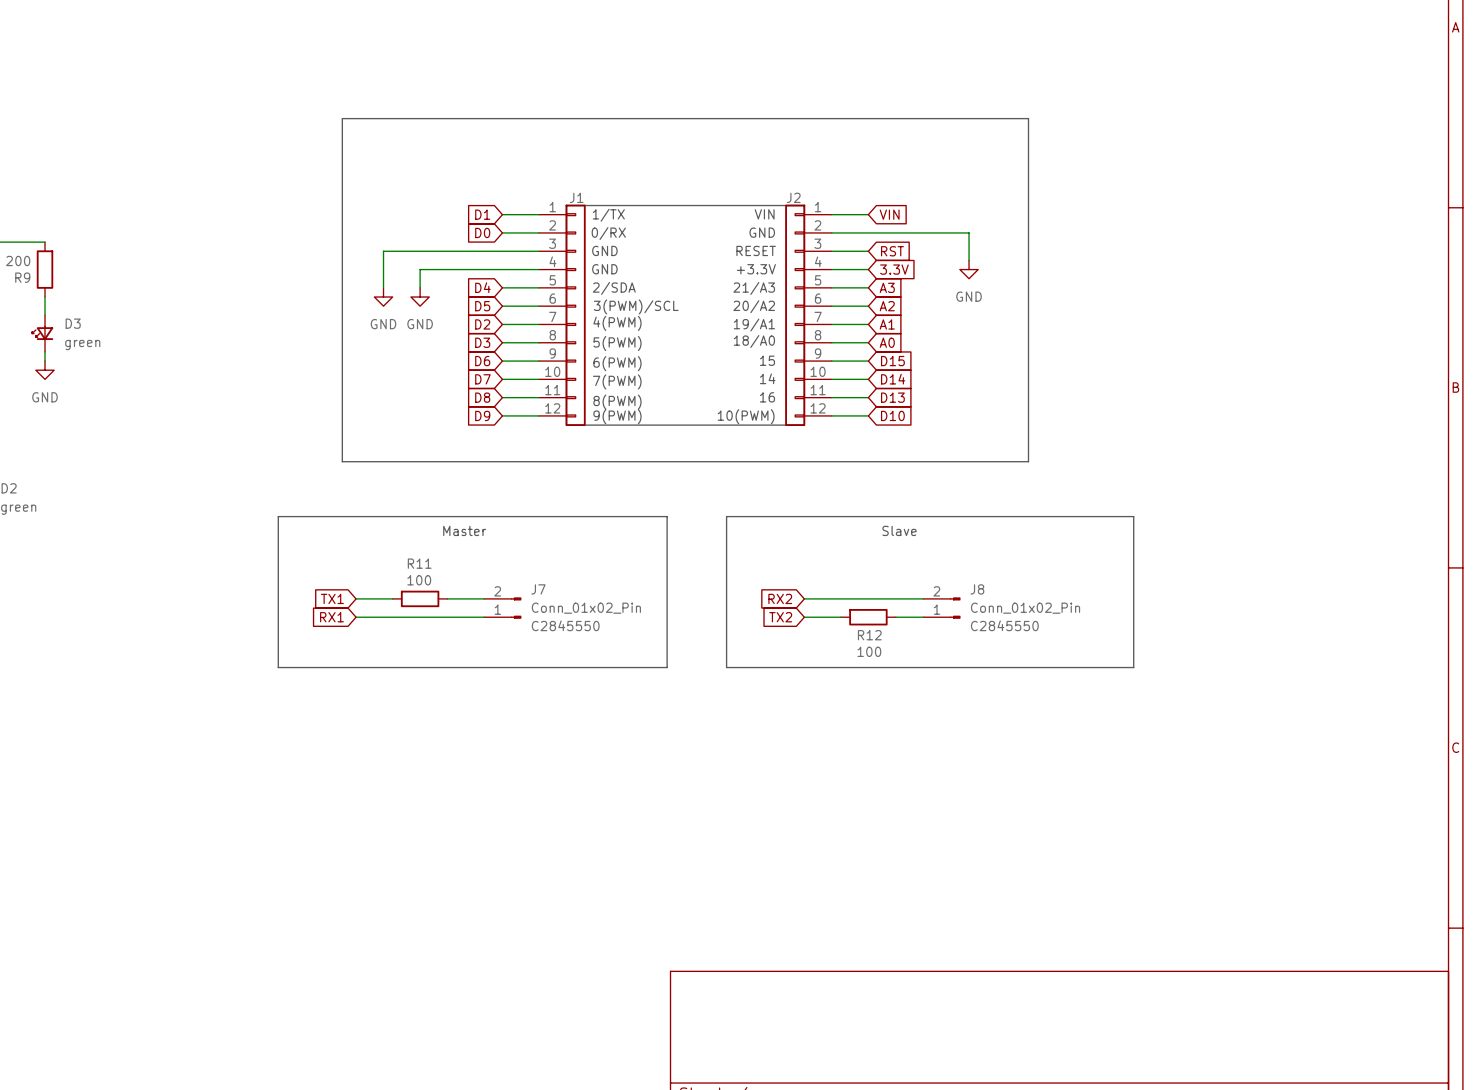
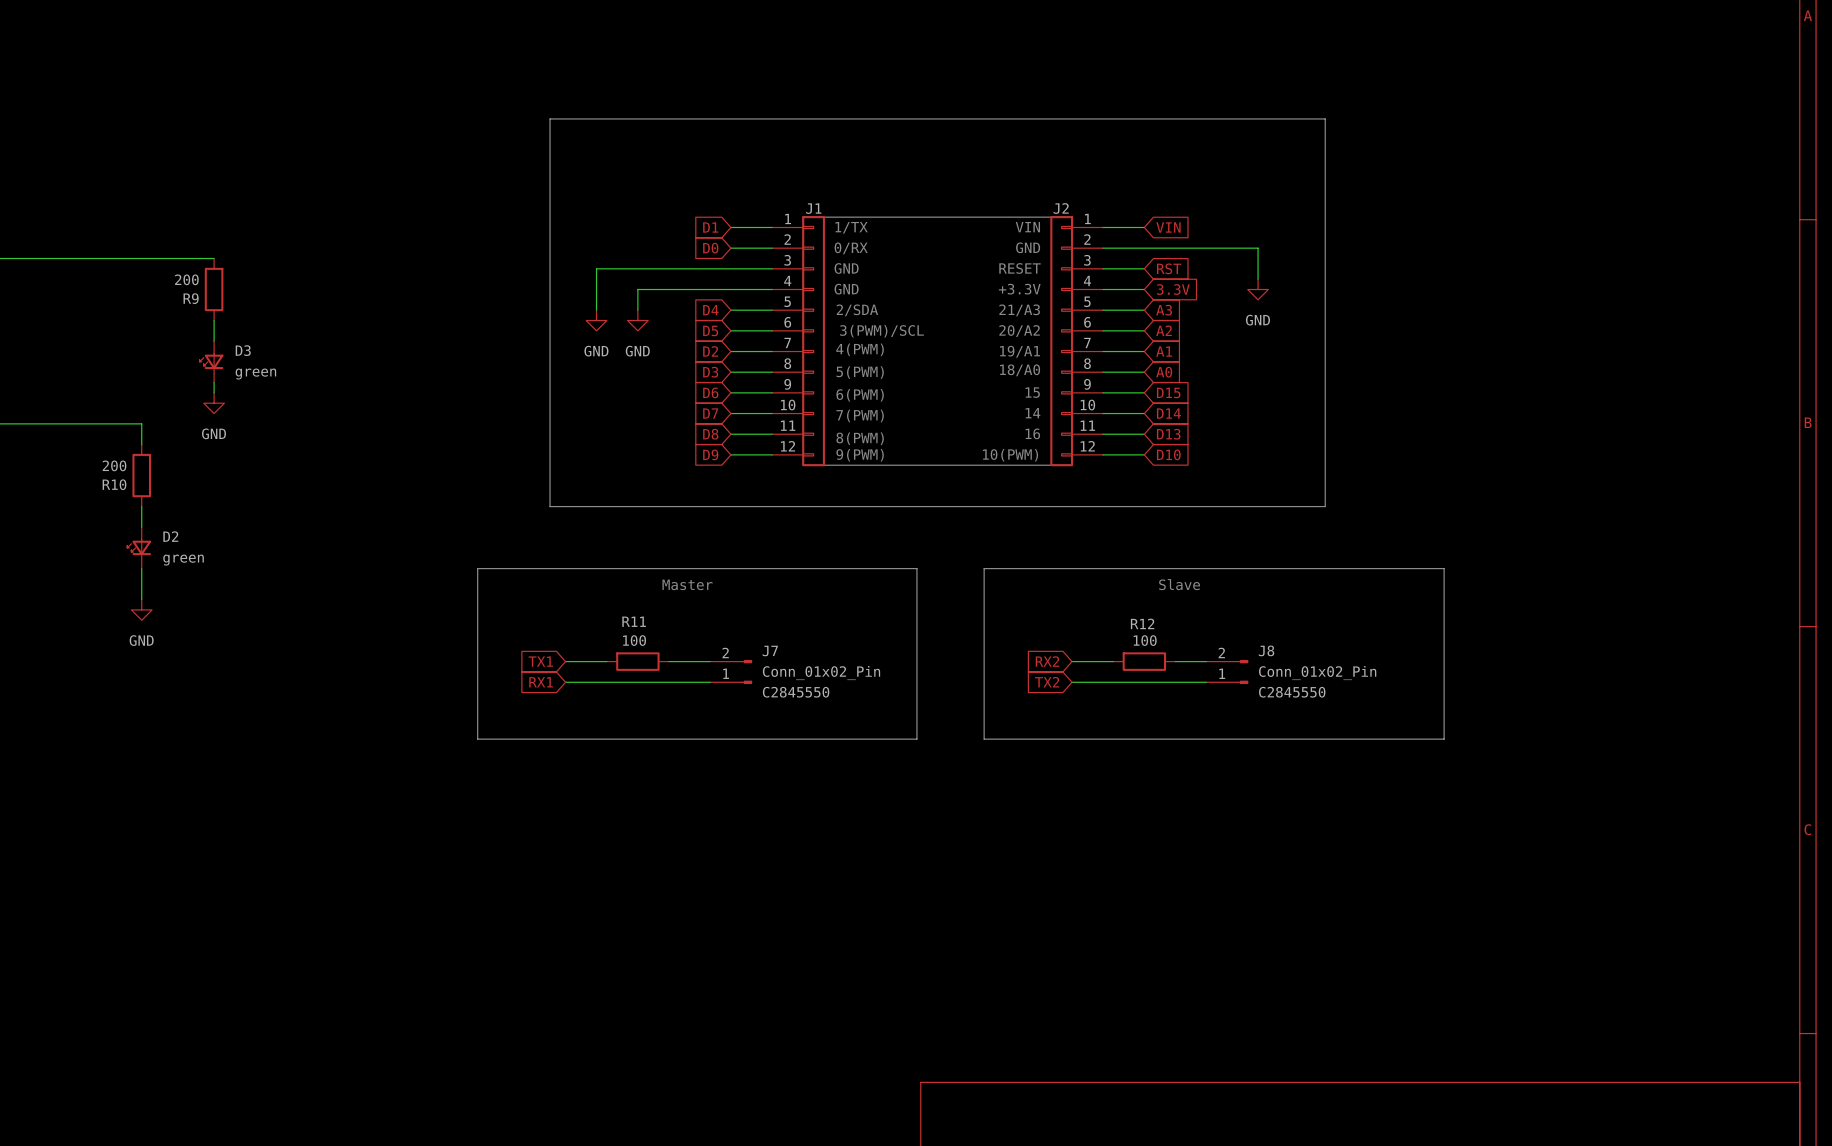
wire: (840, 598) (895, 598) -> (1113, 682) (1175, 682)
R12 position: (868, 617) -> (1144, 661)
R12 name position: R12 (869, 635) -> R12 (1142, 623)
R12 value position: 100 (869, 651) -> 100 (1145, 640)

